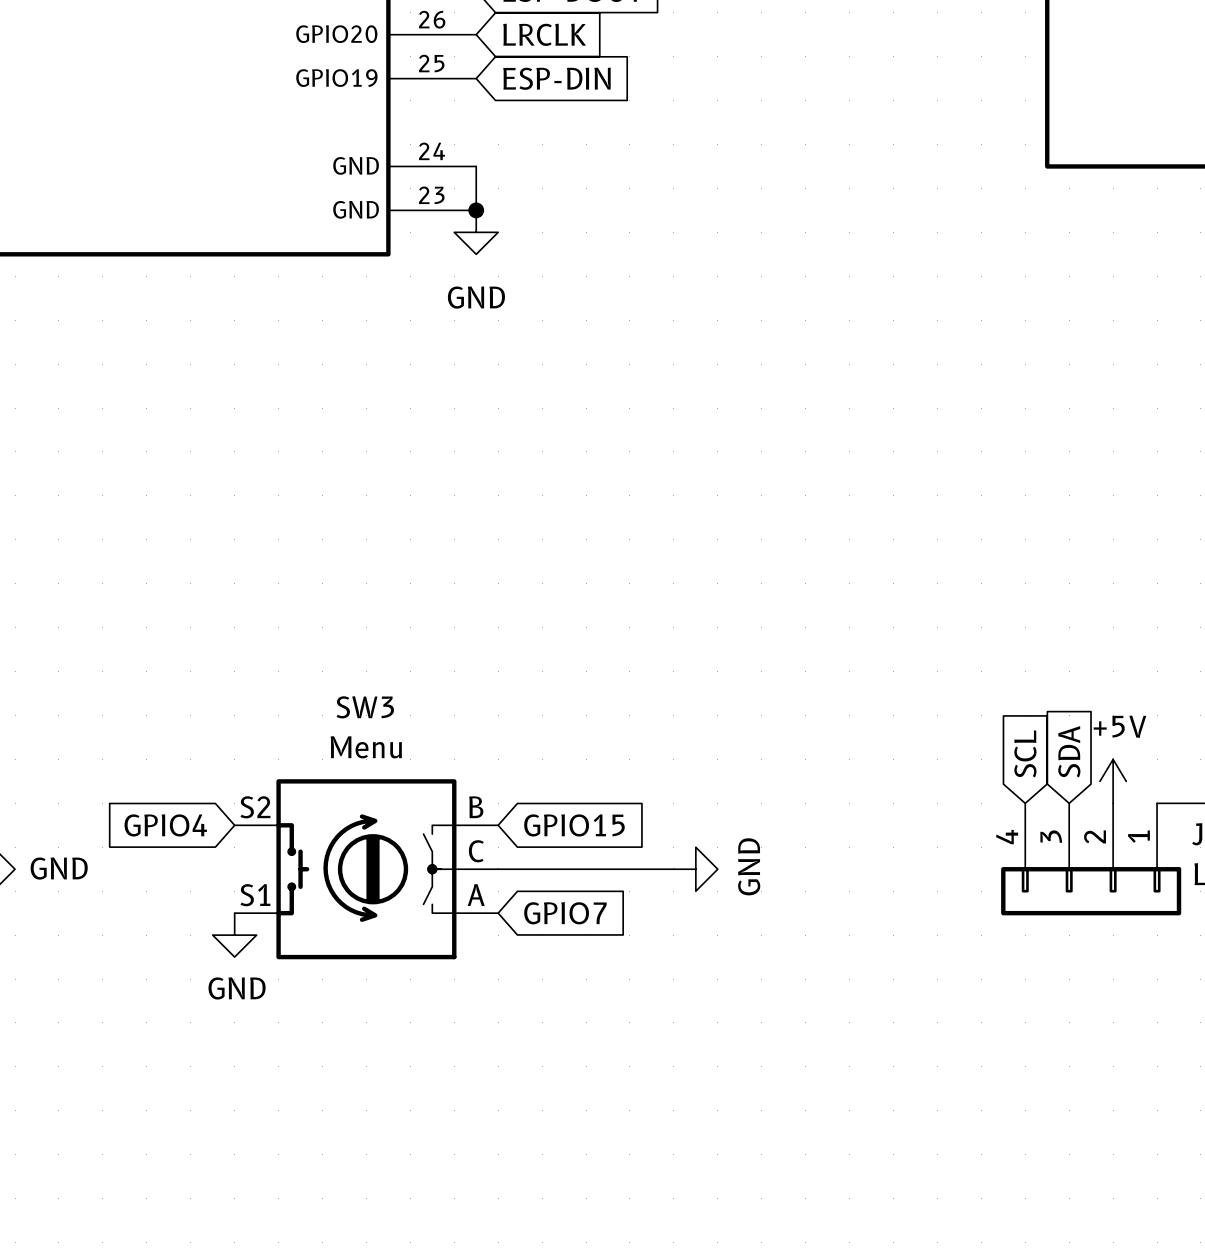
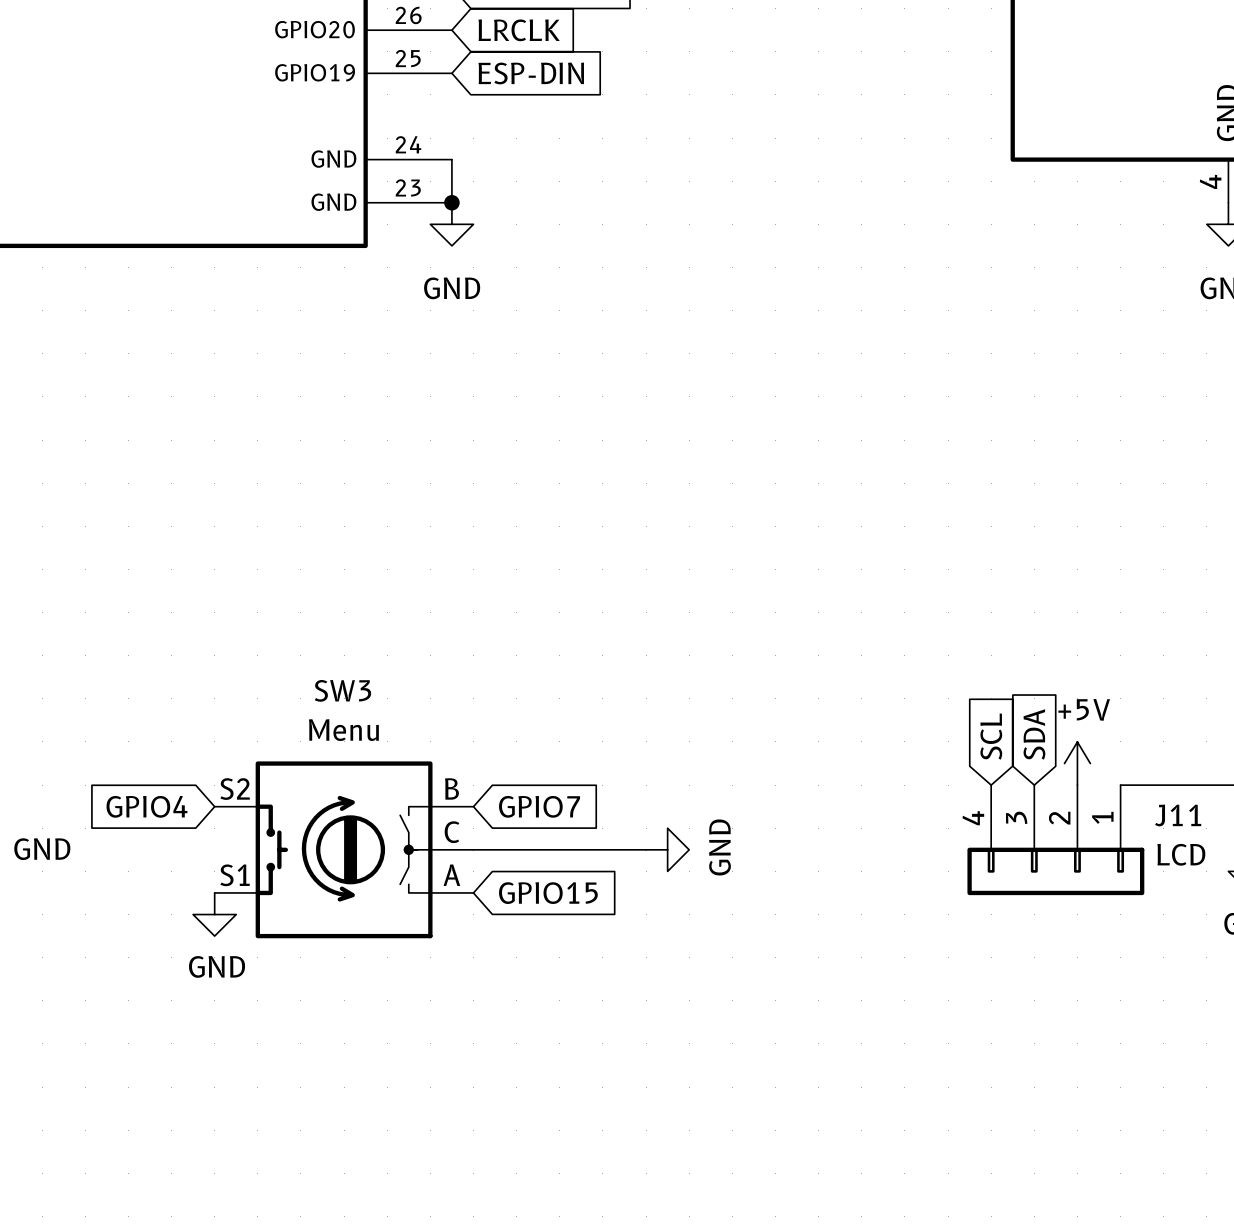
global label: GPIO15 (574, 825) -> GPIO7 (539, 806)
global label: GPIO7 (565, 913) -> GPIO15 (548, 893)

